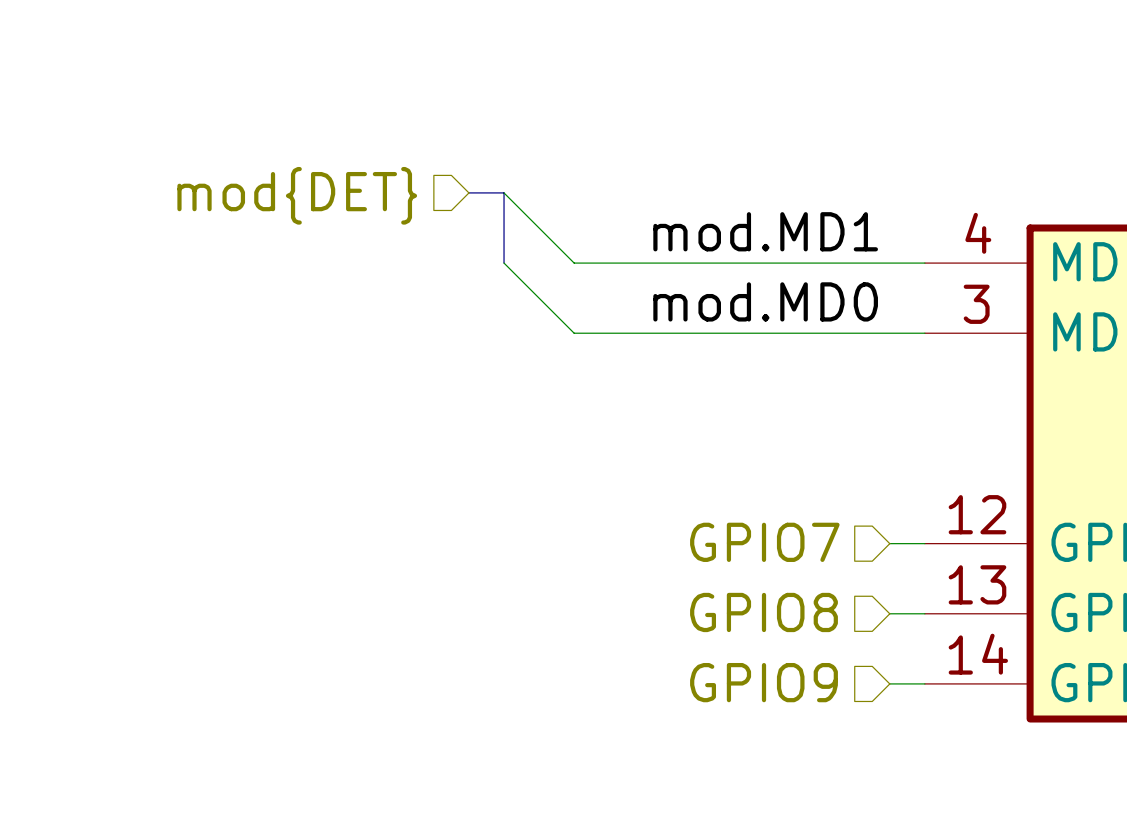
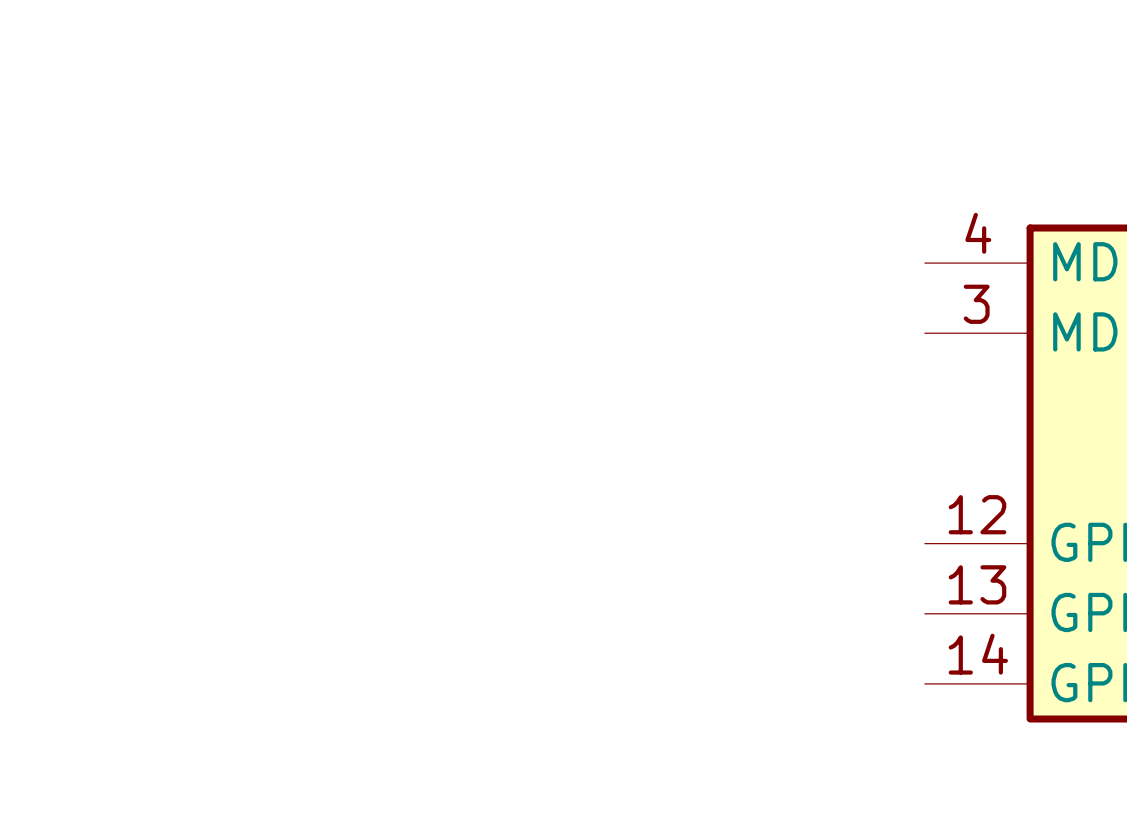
bus: (468, 192) (504, 192) (504, 263) -> none
wire: (504, 192) (574, 263) (924, 263) -> none
hierarchical label: mod{DET} (297, 195) -> none
label: mod.MD1 (765, 231) -> none
wire: (504, 263) (574, 333) (924, 333) -> none
label: mod.MD0 (765, 301) -> none
hierarchical label: GPIO7 (764, 542) -> none
wire: (889, 543) (924, 543) -> none
hierarchical label: GPIO8 (764, 612) -> none
wire: (889, 613) (924, 613) -> none
hierarchical label: GPIO9 (764, 682) -> none
wire: (889, 683) (924, 683) -> none

